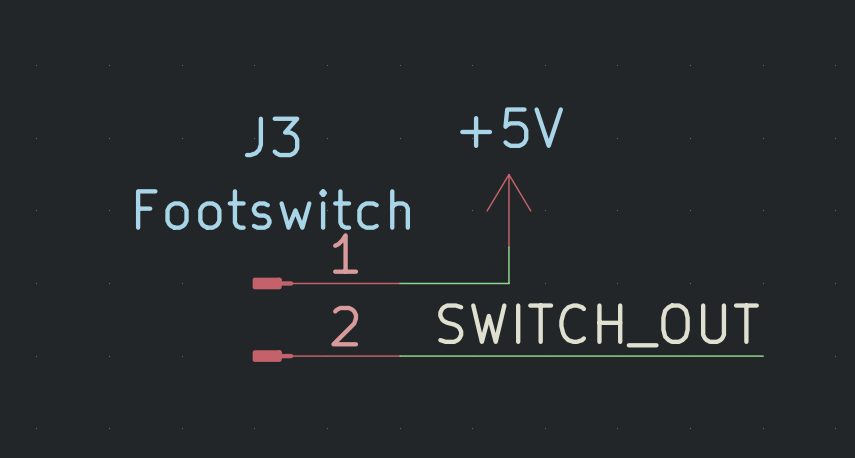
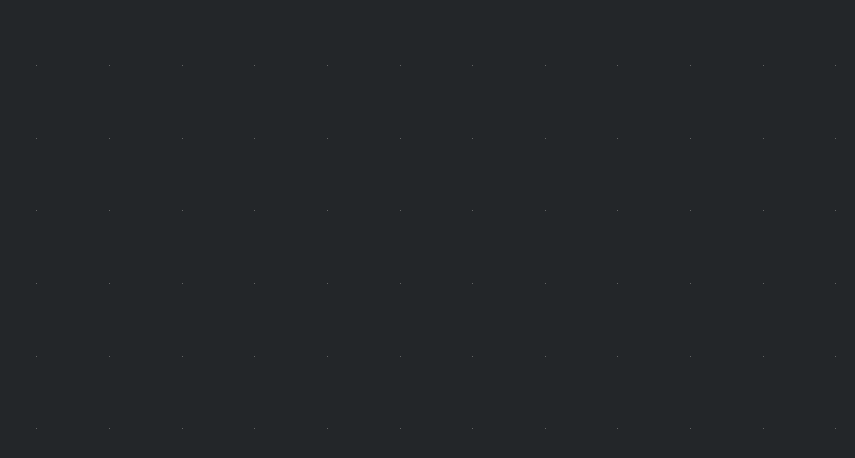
power symbol: +5V (508, 210) -> none
wire: (508, 247) (508, 283) (400, 283) -> none
J3: Footswitch (326, 319) -> none
label: SWITCH_OUT (598, 325) -> none
wire: (400, 356) (763, 356) -> none

